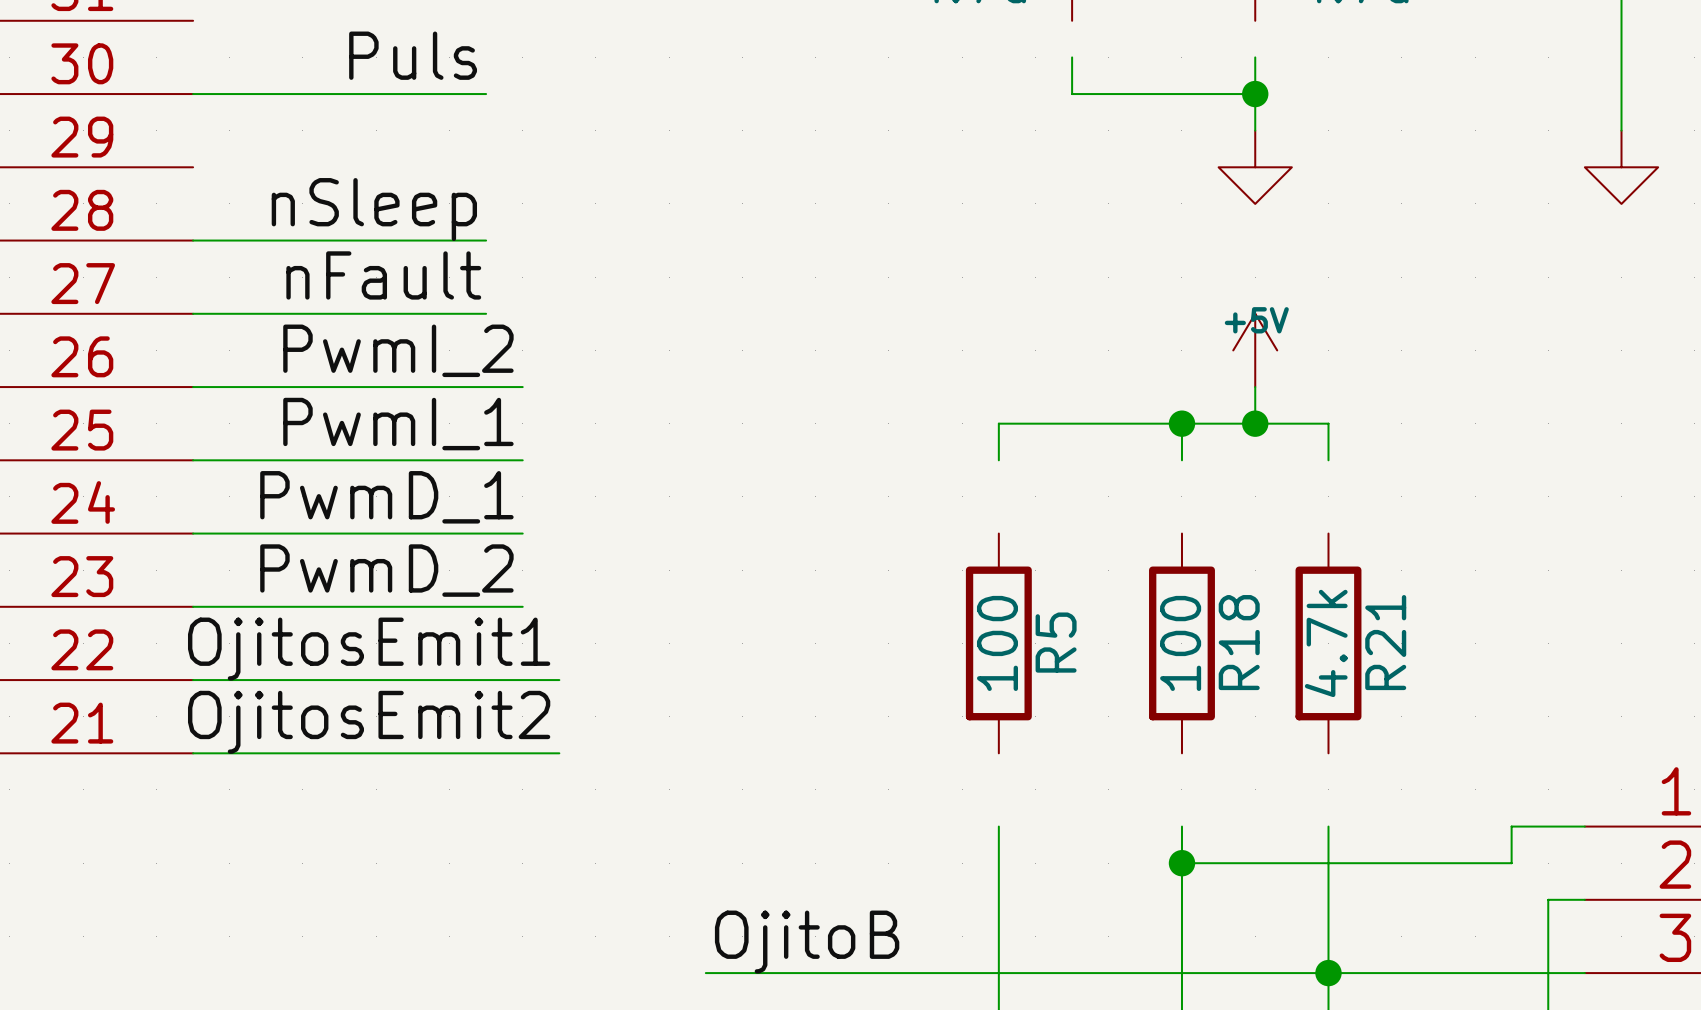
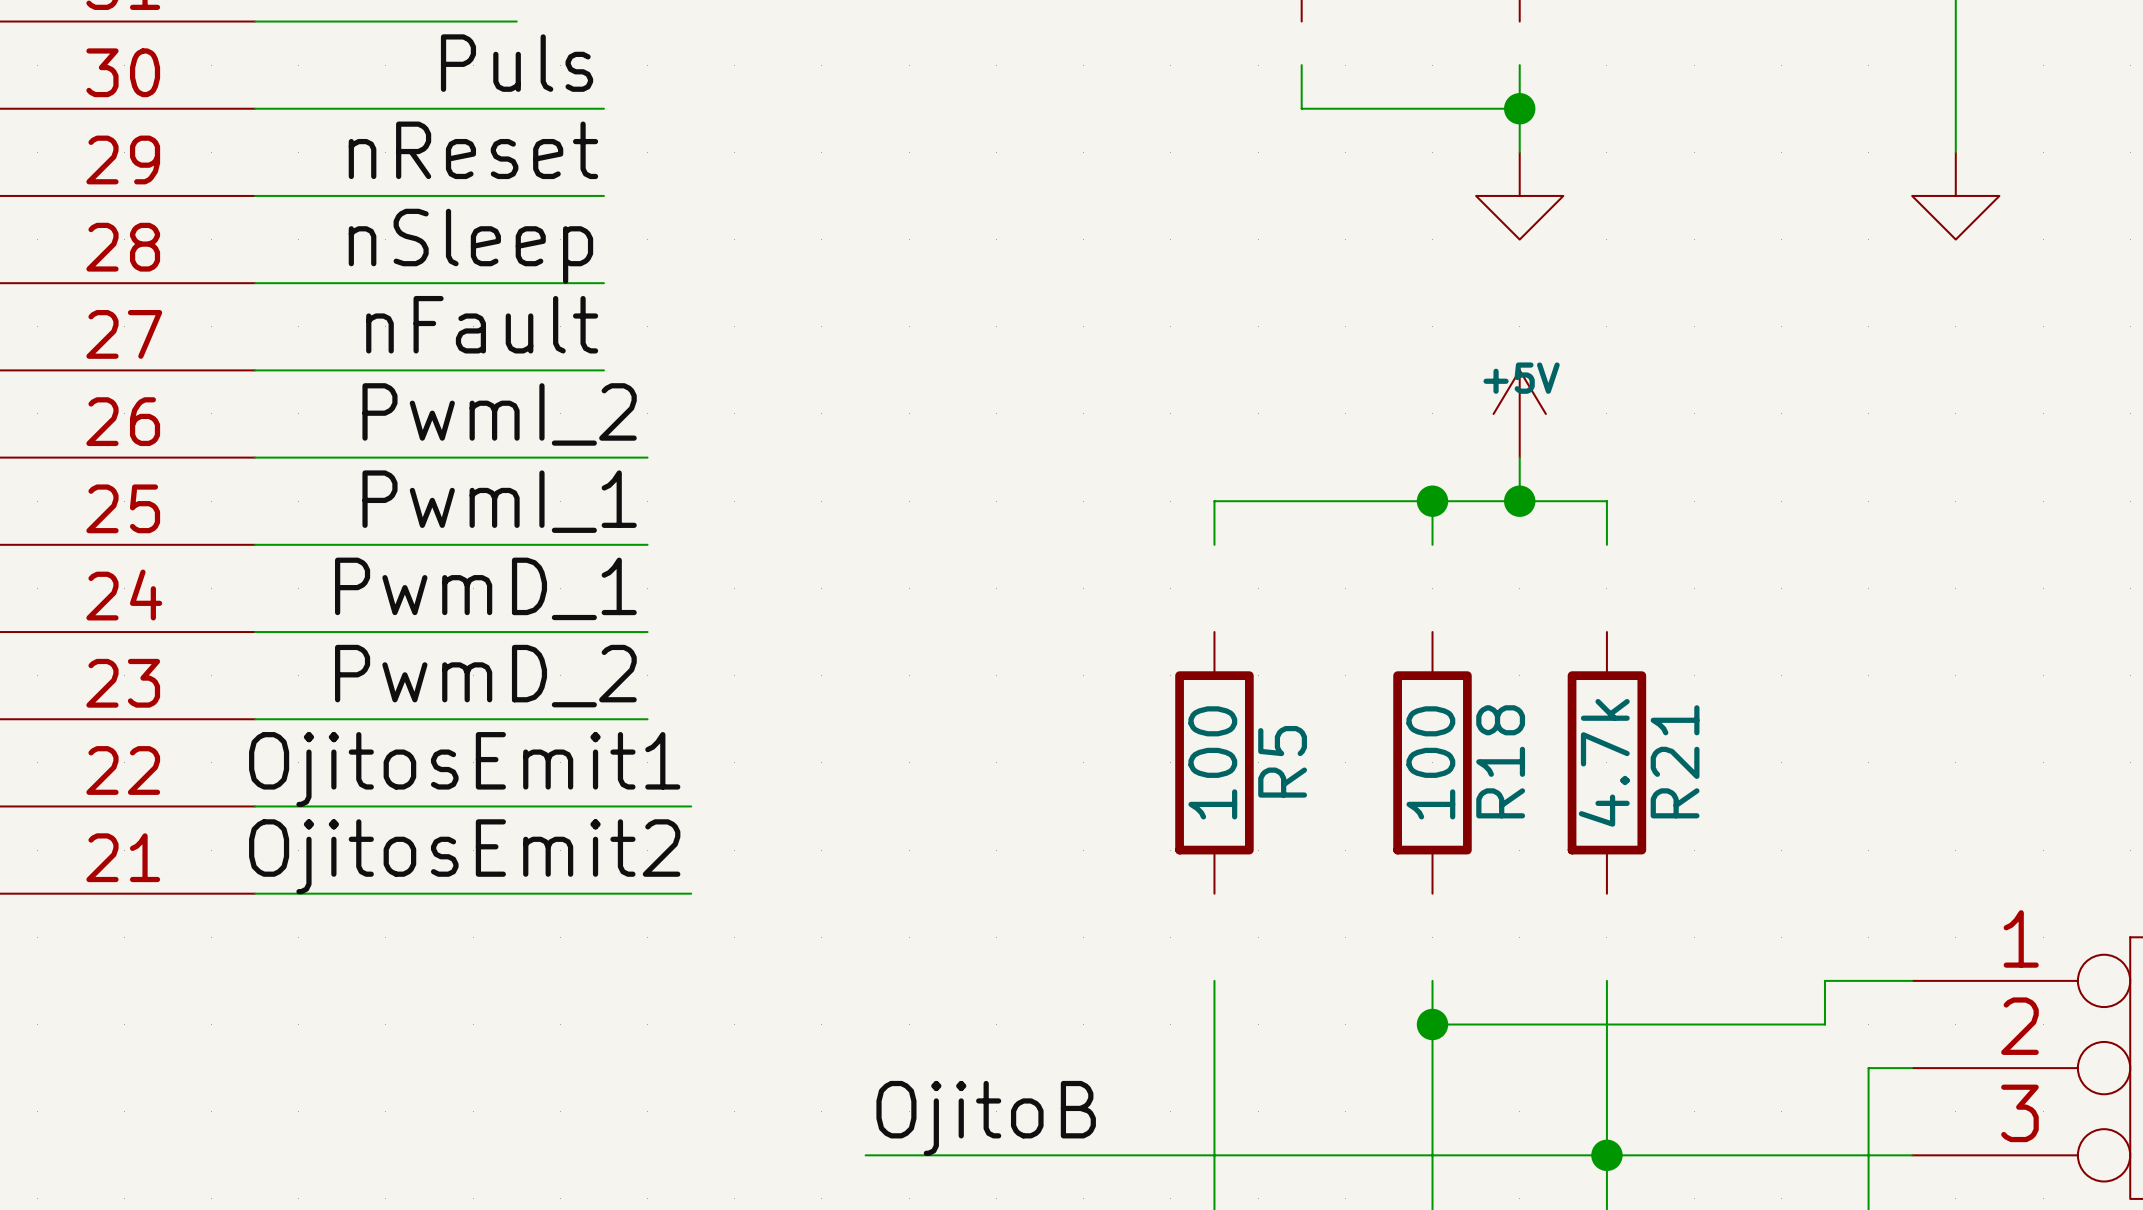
wire: none -> (255, 21) (516, 21)
label: none -> nReset (473, 150)
wire: none -> (255, 195) (603, 195)

